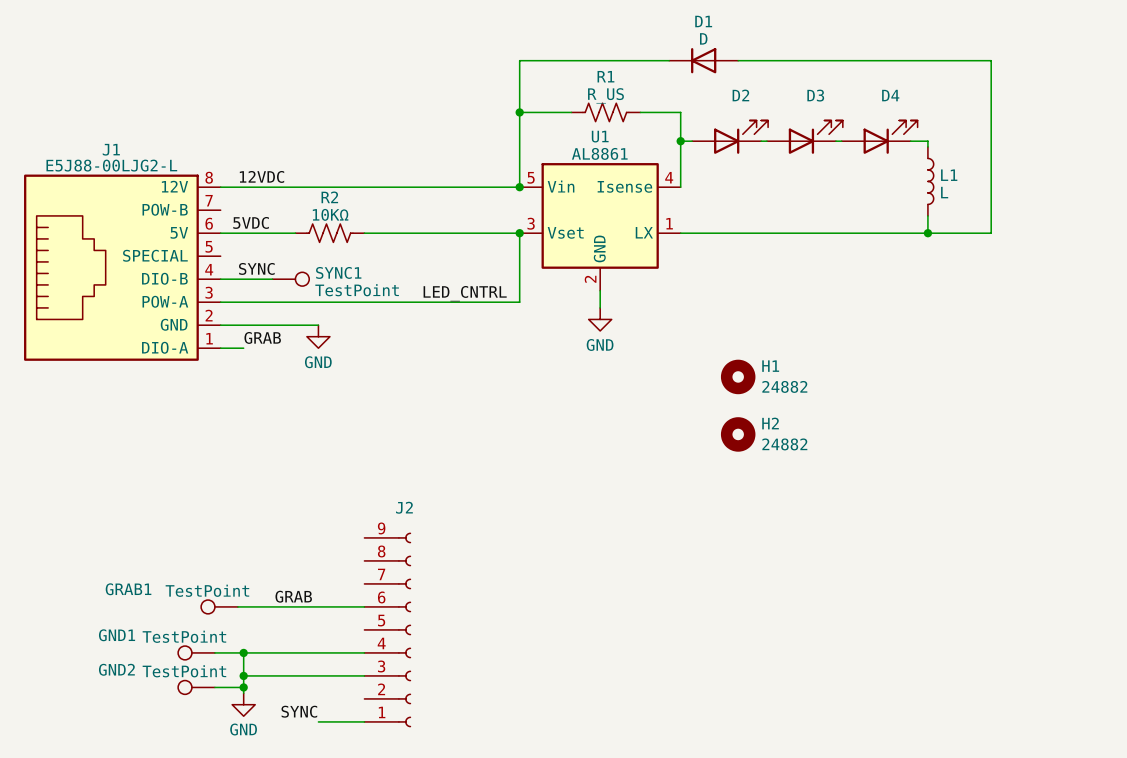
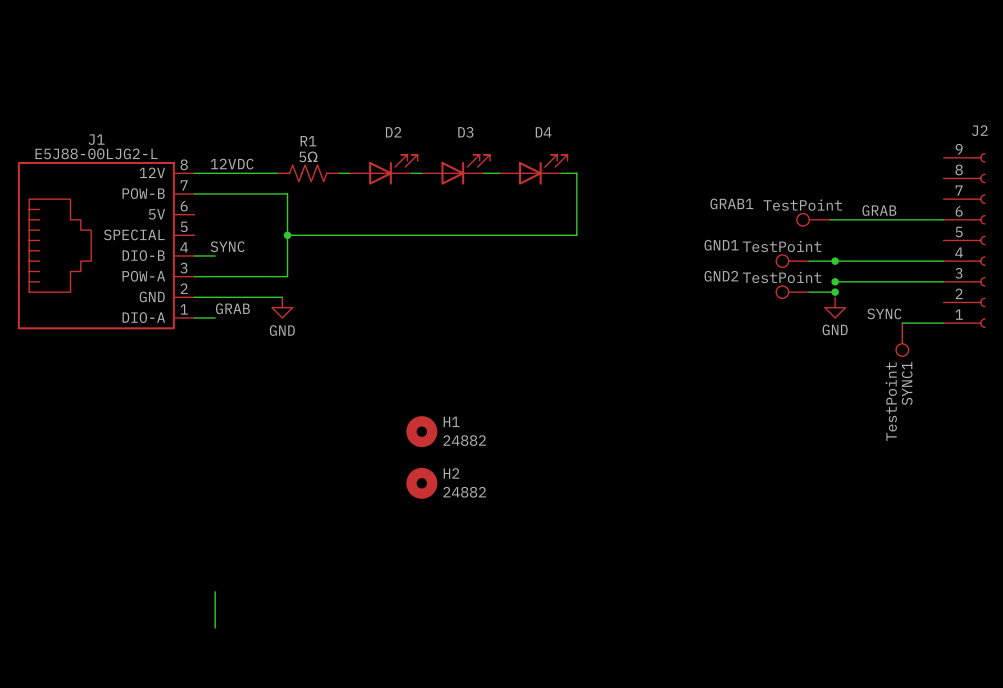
wire: (669, 60) (519, 60) (519, 187) (473, 187) -> none
D1: D (703, 60) -> none
wire: (738, 60) (991, 60) (991, 233) (680, 233) -> none
R1 value: R_US (605, 95) -> 5Ω (308, 156)
wire: (519, 112) (571, 112) -> none
junction: (519, 112) -> none
R1 position: (605, 112) -> (308, 173)
wire: (640, 112) (680, 112) (680, 187) -> none
D2 position: (730, 137) -> (383, 169)
D3 position: (804, 137) -> (455, 169)
D4 position: (879, 137) -> (533, 169)
wire: (680, 141) (692, 141) -> none
junction: (680, 141) -> none
wire: (761, 141) (766, 141) -> none
wire: (835, 141) (841, 141) -> none
wire: (910, 141) (927, 141) (927, 146) -> none
L1: L (930, 181) -> none
junction: (519, 187) -> none
wire: none -> (561, 173) (576, 173) (576, 235) (287, 235)
wire: (927, 215) (927, 233) -> none
label: 5VDC (251, 222) -> none
U1: AL8861 (600, 226) -> none
label: none -> GRAB (879, 210)
wire: (220, 233) (295, 233) -> none
R2: 10KΩ (329, 233) -> none
wire: (364, 233) (519, 233) (519, 302) (324, 302) -> (194, 193) (287, 193) (287, 276)
junction: (519, 233) -> none
junction: (927, 233) -> none
wire: none -> (829, 219) (943, 219)
junction: none -> (287, 235)
wire: (243, 279) (272, 279) -> none
SYNC1 position: (290, 279) -> (902, 339)
SYNC1 rotation: 0° (302, 279) -> 90° clockwise (902, 350)
wire: none -> (809, 261) (943, 261)
junction: none -> (835, 261)
wire: (600, 290) (600, 307) -> none
label: LED_CNTRL (465, 293) -> none
wire: none -> (835, 281) (943, 281)
junction: none -> (835, 281)
power symbol: GND (600, 319) -> none
wire: none -> (809, 292) (835, 292)
junction: none -> (835, 292)
power symbol: none -> GND (835, 307)
label: none -> SYNC (884, 313)
wire: none -> (902, 323) (943, 323)
H1 position: (738, 376) -> (421, 431)
H2 position: (738, 434) -> (421, 483)
label: GRAB (293, 596) -> none
GRAB1 position: (219, 606) -> (813, 219)
wire: (237, 606) (364, 606) -> none
J2 position: (387, 629) -> (964, 240)
GND1 position: (196, 652) -> (792, 261)
wire: (214, 652) (364, 652) -> none
junction: (243, 652) -> none
wire: (243, 675) (364, 675) -> none
junction: (243, 675) -> none
GND2 position: (196, 687) -> (792, 292)
wire: (214, 687) (243, 687) -> none
junction: (243, 687) -> none
power symbol: GND (243, 704) -> none
label: SYNC (299, 711) -> none
wire: (318, 721) (364, 721) -> none

